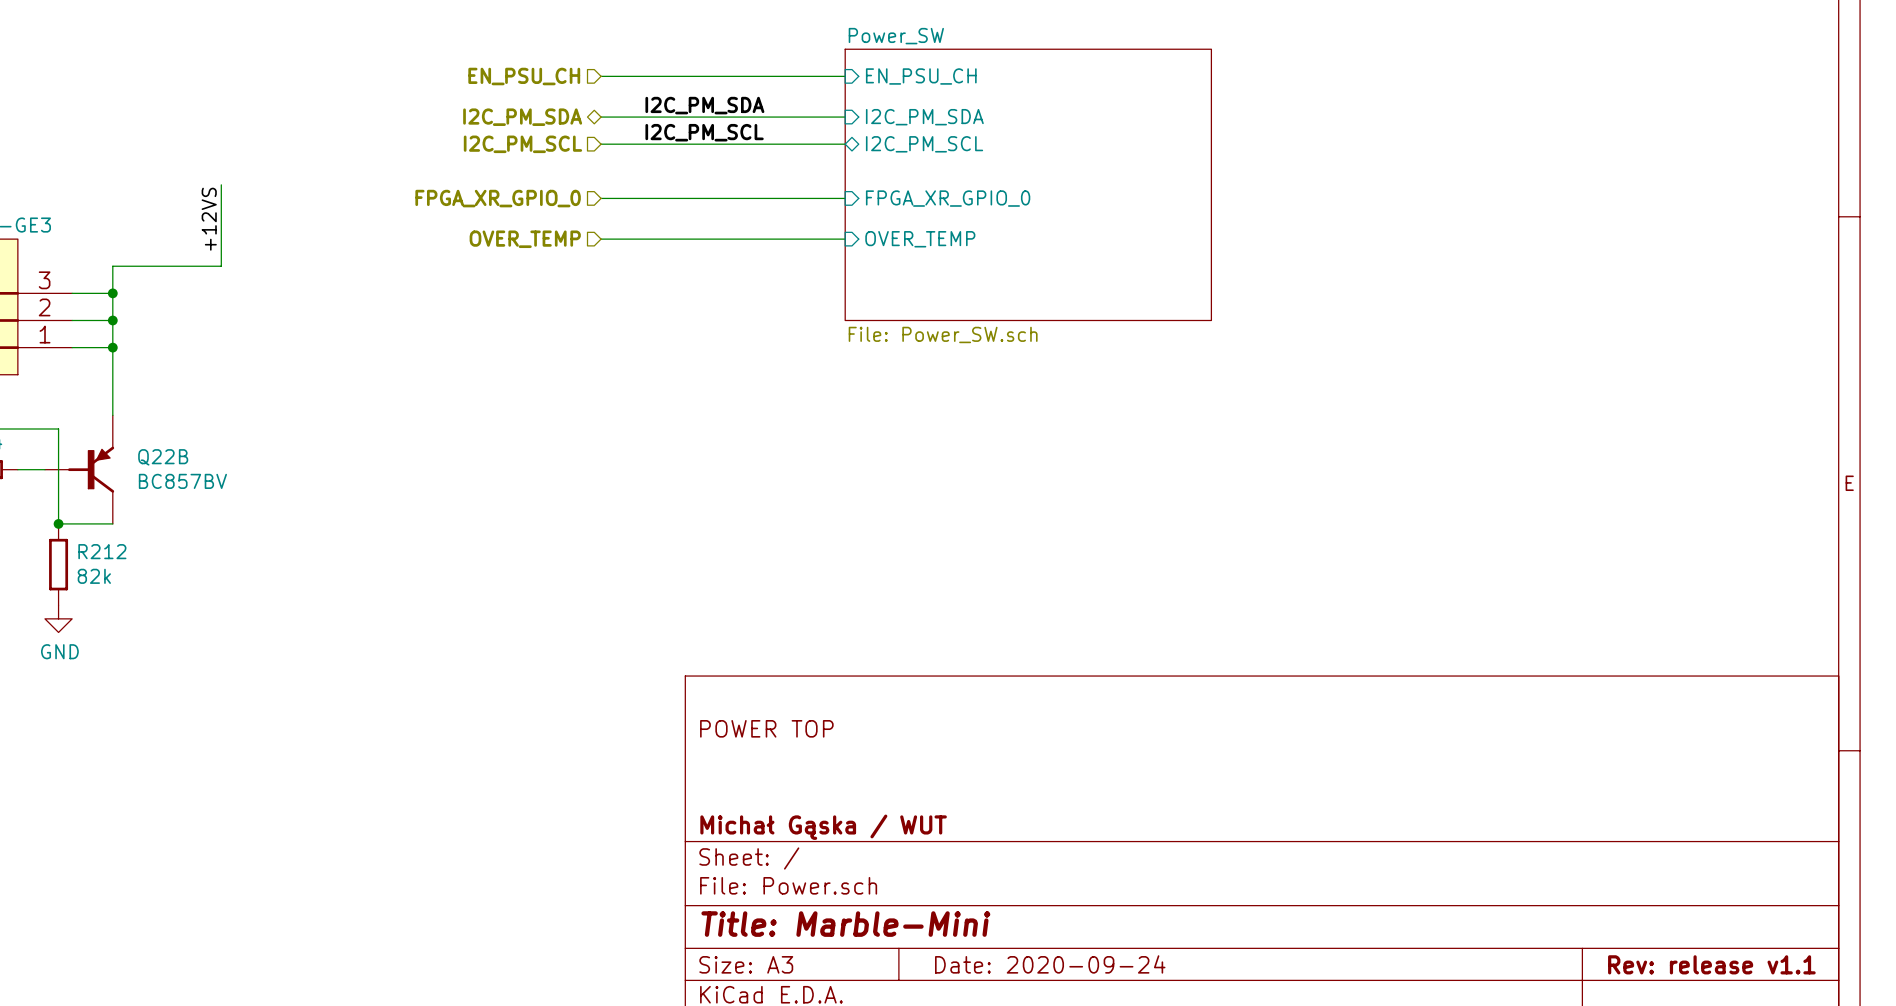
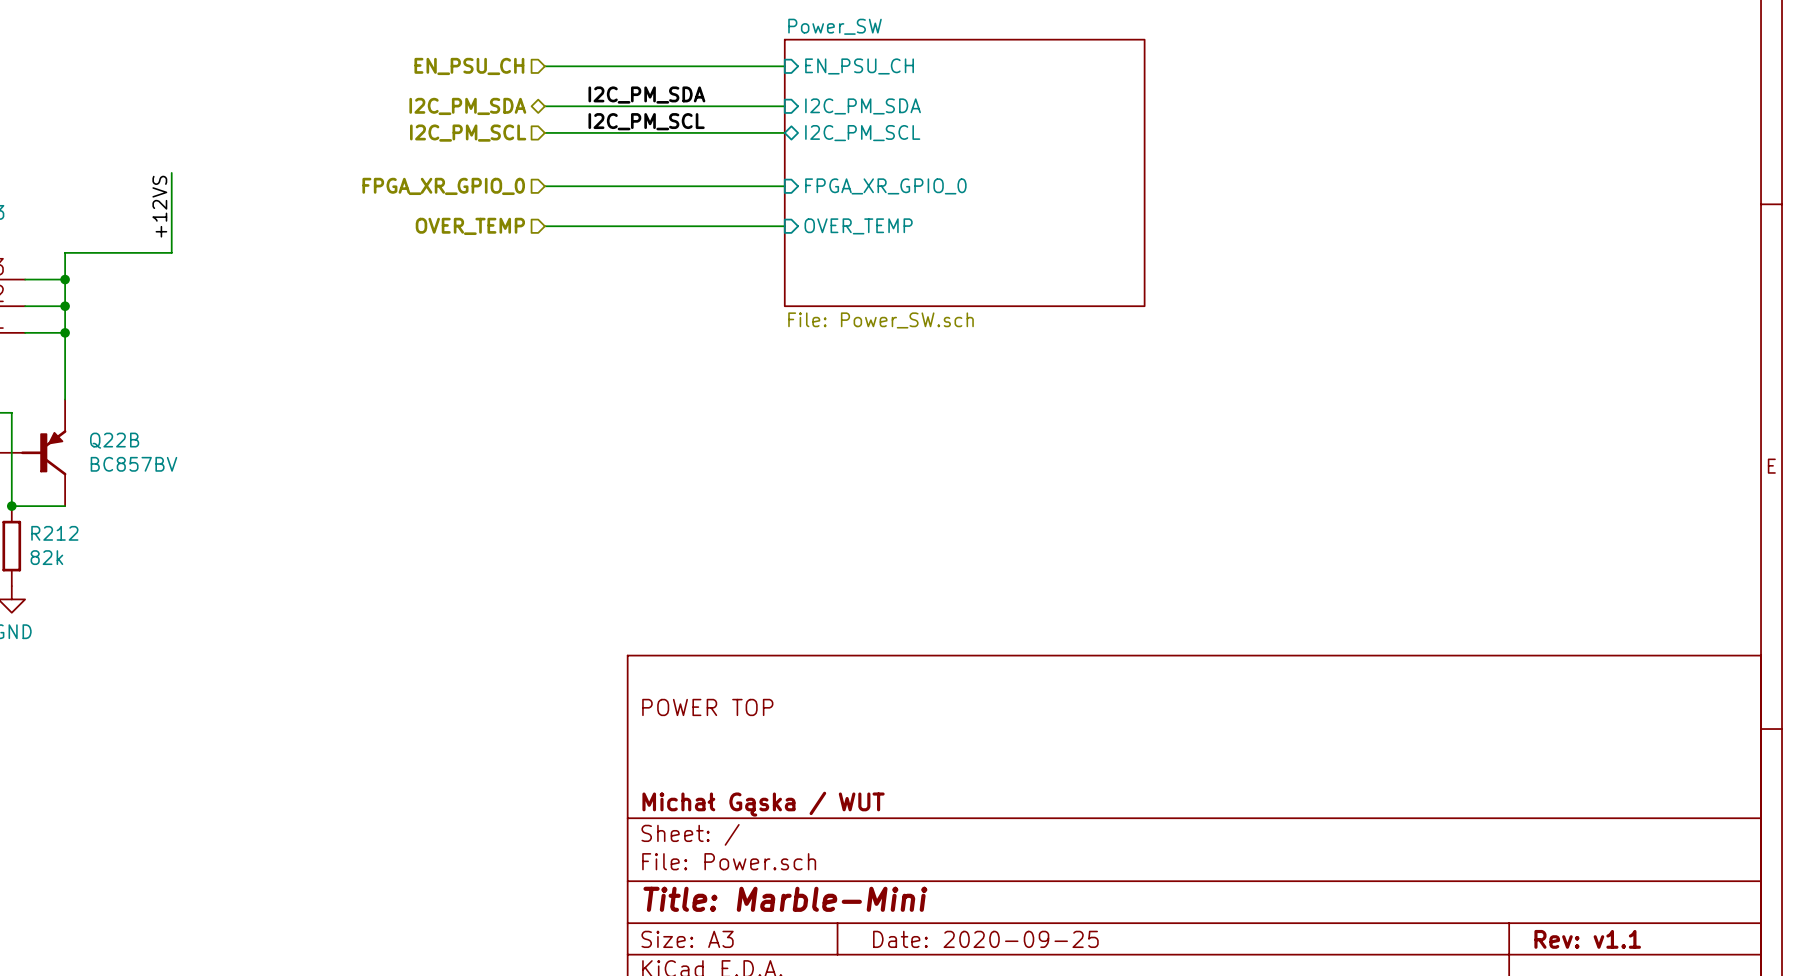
title block: Date: 2020-09-24 (1050, 964) -> Date: 2020-09-25 (985, 939)
title block: Rev: release v1.1 (1711, 964) -> Rev: v1.1 (1587, 939)

